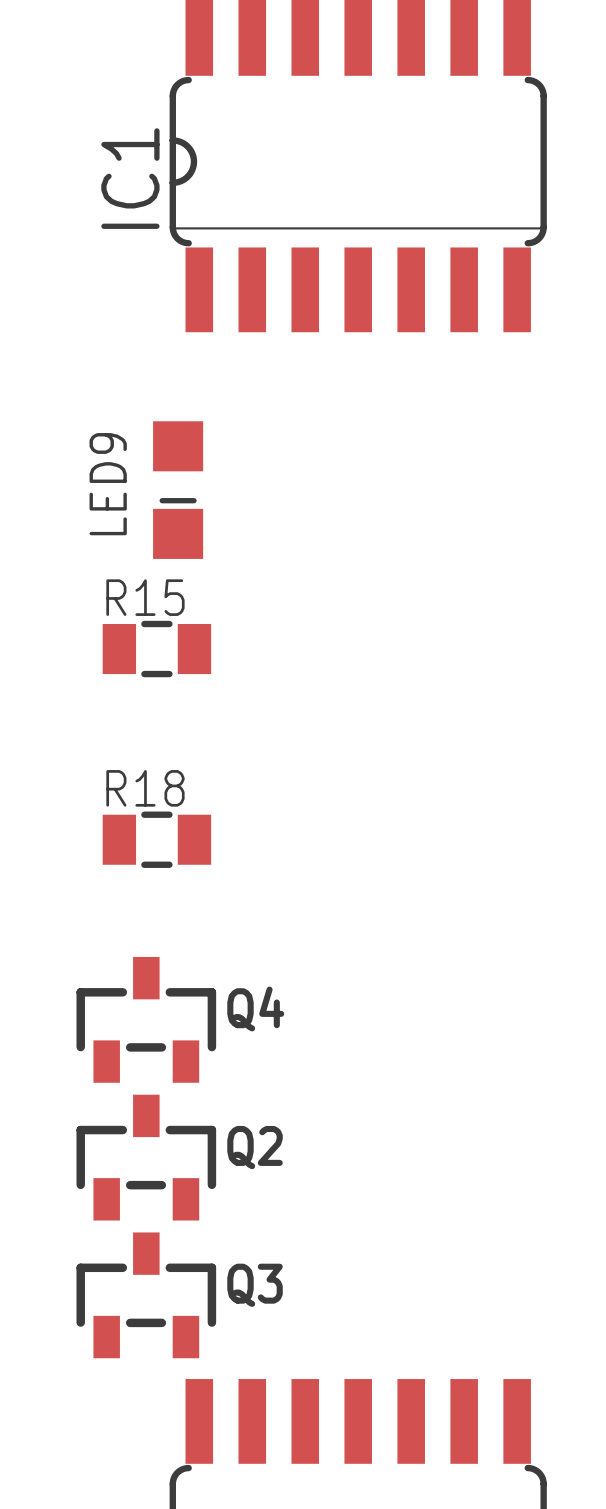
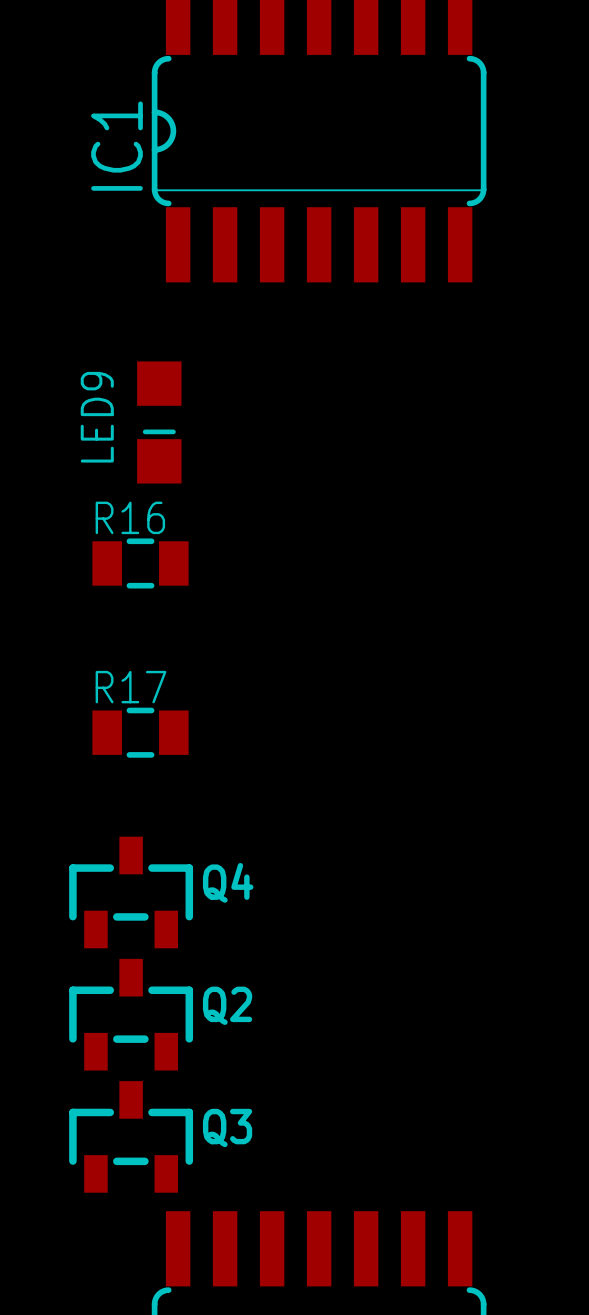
R15 name: R15 (145, 597) -> R16 (130, 517)
R18 name: R18 (145, 788) -> R17 (131, 687)

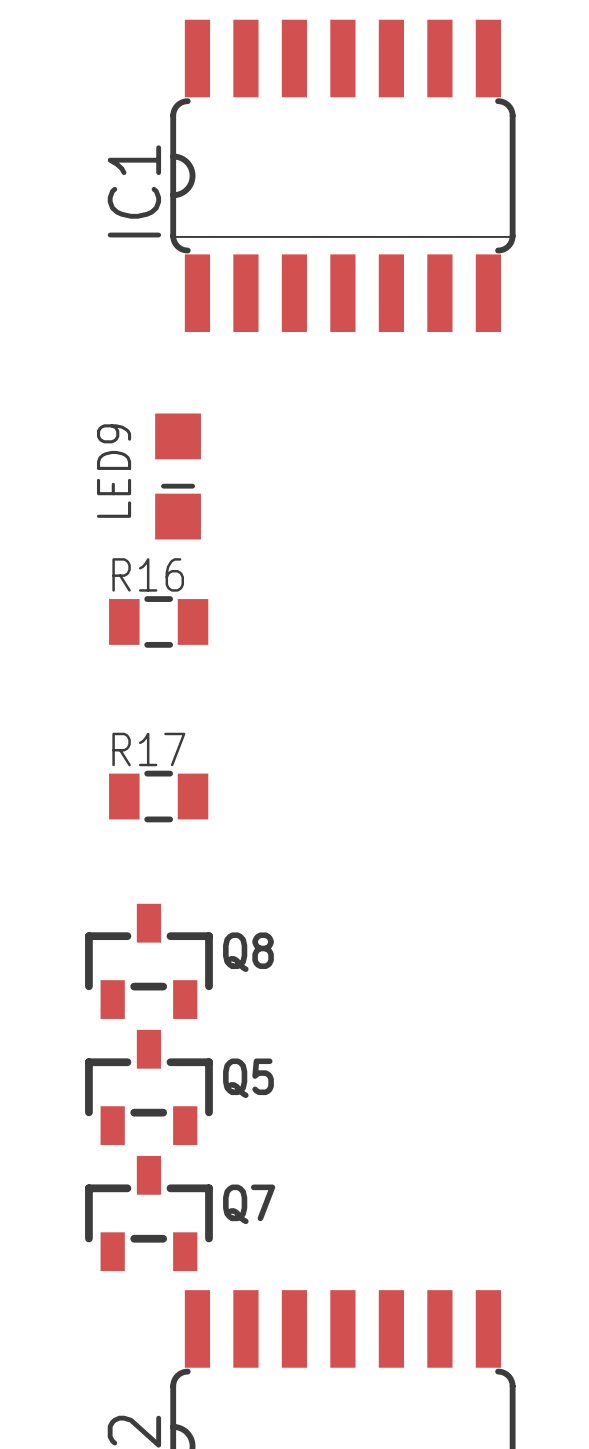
Q4 name: Q4 (228, 882) -> Q8 (248, 952)
Q2 name: Q2 (227, 1005) -> Q5 (248, 1078)
Q3 name: Q3 (227, 1128) -> Q7 (249, 1204)

